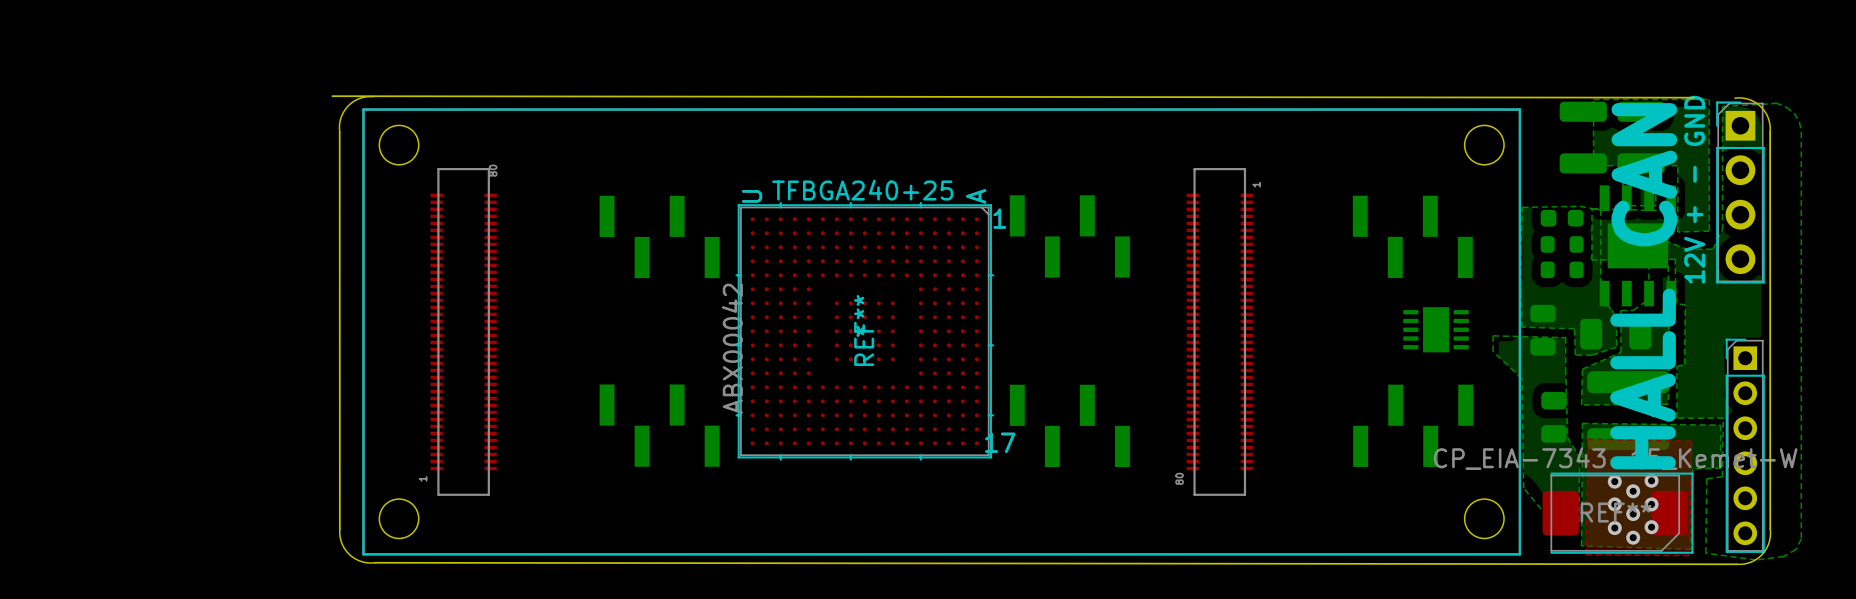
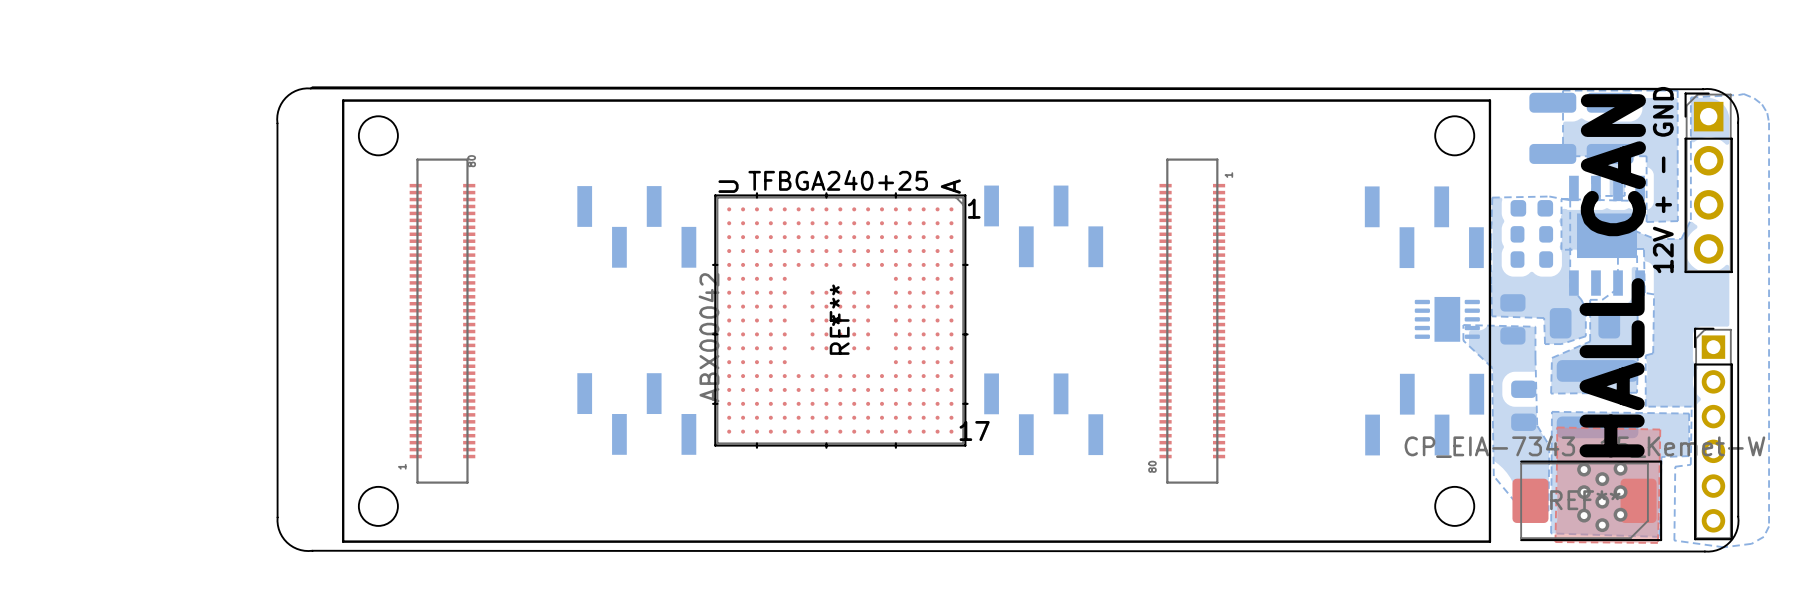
board edge: (373, 96) (357, 99) (348, 106) (341, 116) (339, 127) (339, 533) (344, 548) (352, 557) (359, 560) (371, 563) (1736, 564) -> (1703, 89) (299, 89) (291, 92) (283, 100) (279, 107) (277, 119) (277, 521) (280, 532) (287, 542) (296, 548) (308, 551) (1704, 551)
part position: (1412, 236) -> (1424, 227)
part position: (1436, 329) -> (1447, 319)
part position: (1413, 425) -> (1424, 414)

